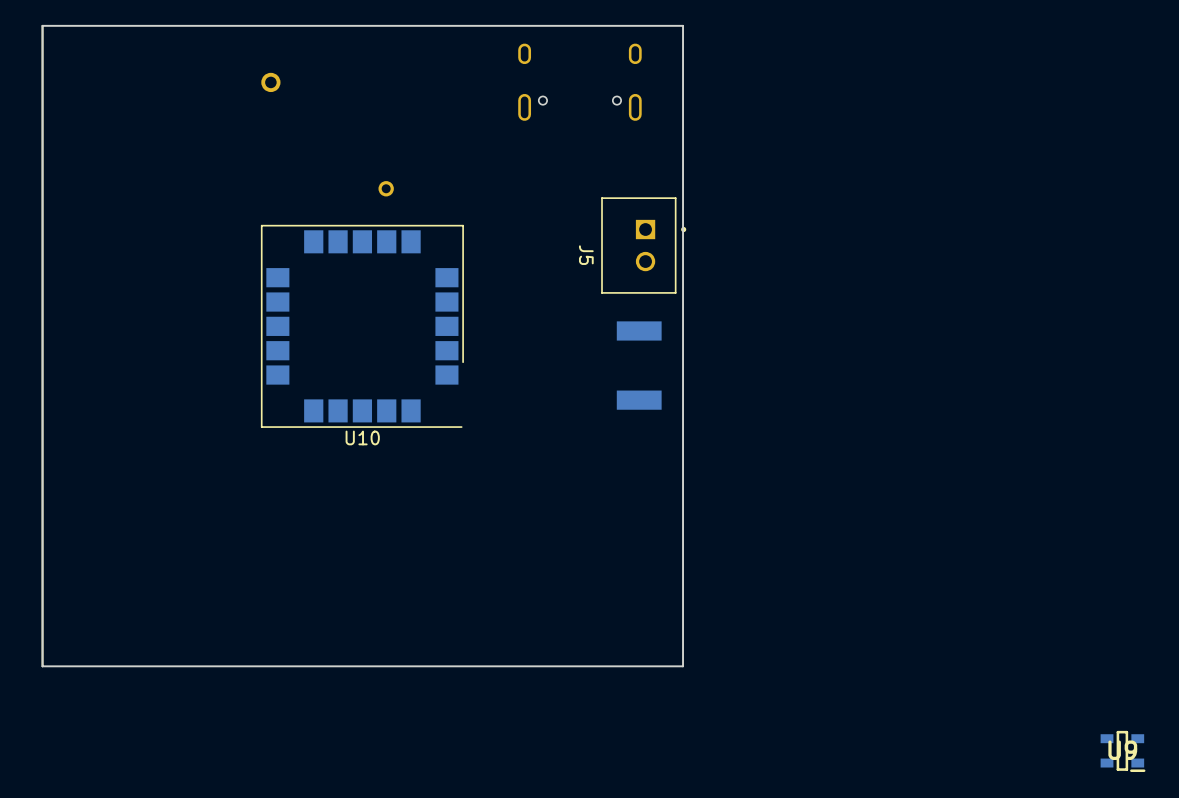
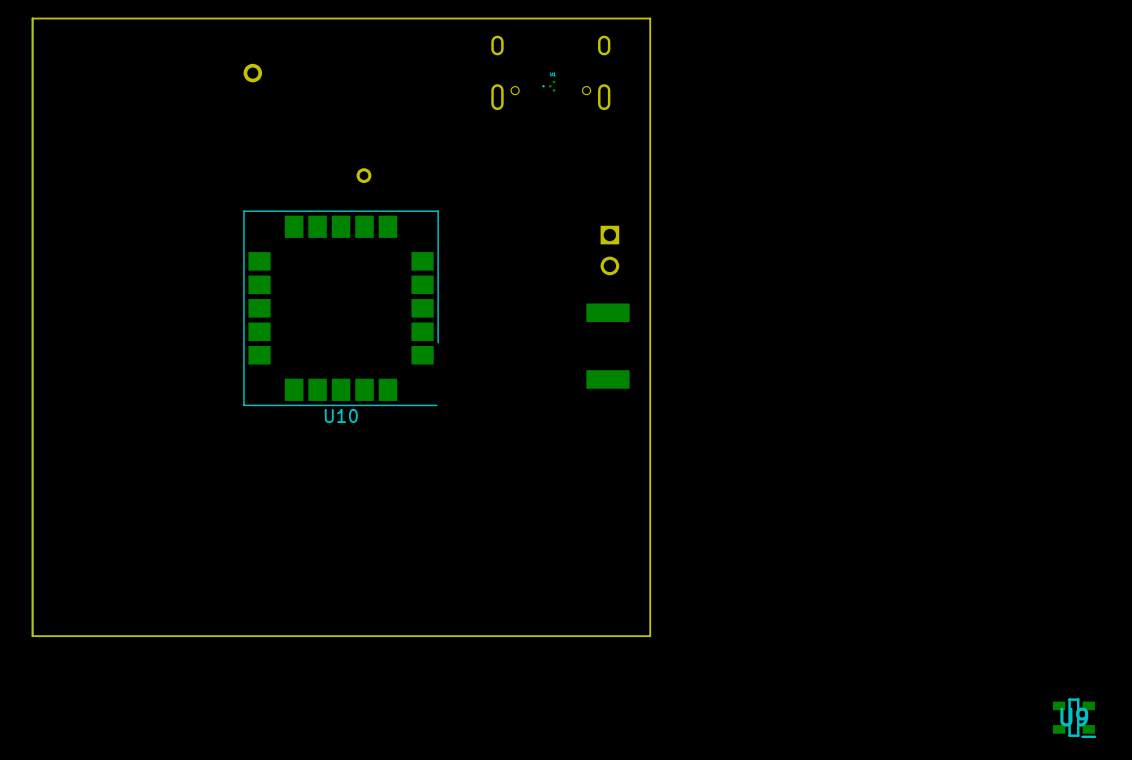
part: none -> (548, 86)
J5 side: bottom (643, 245) -> top (609, 250)

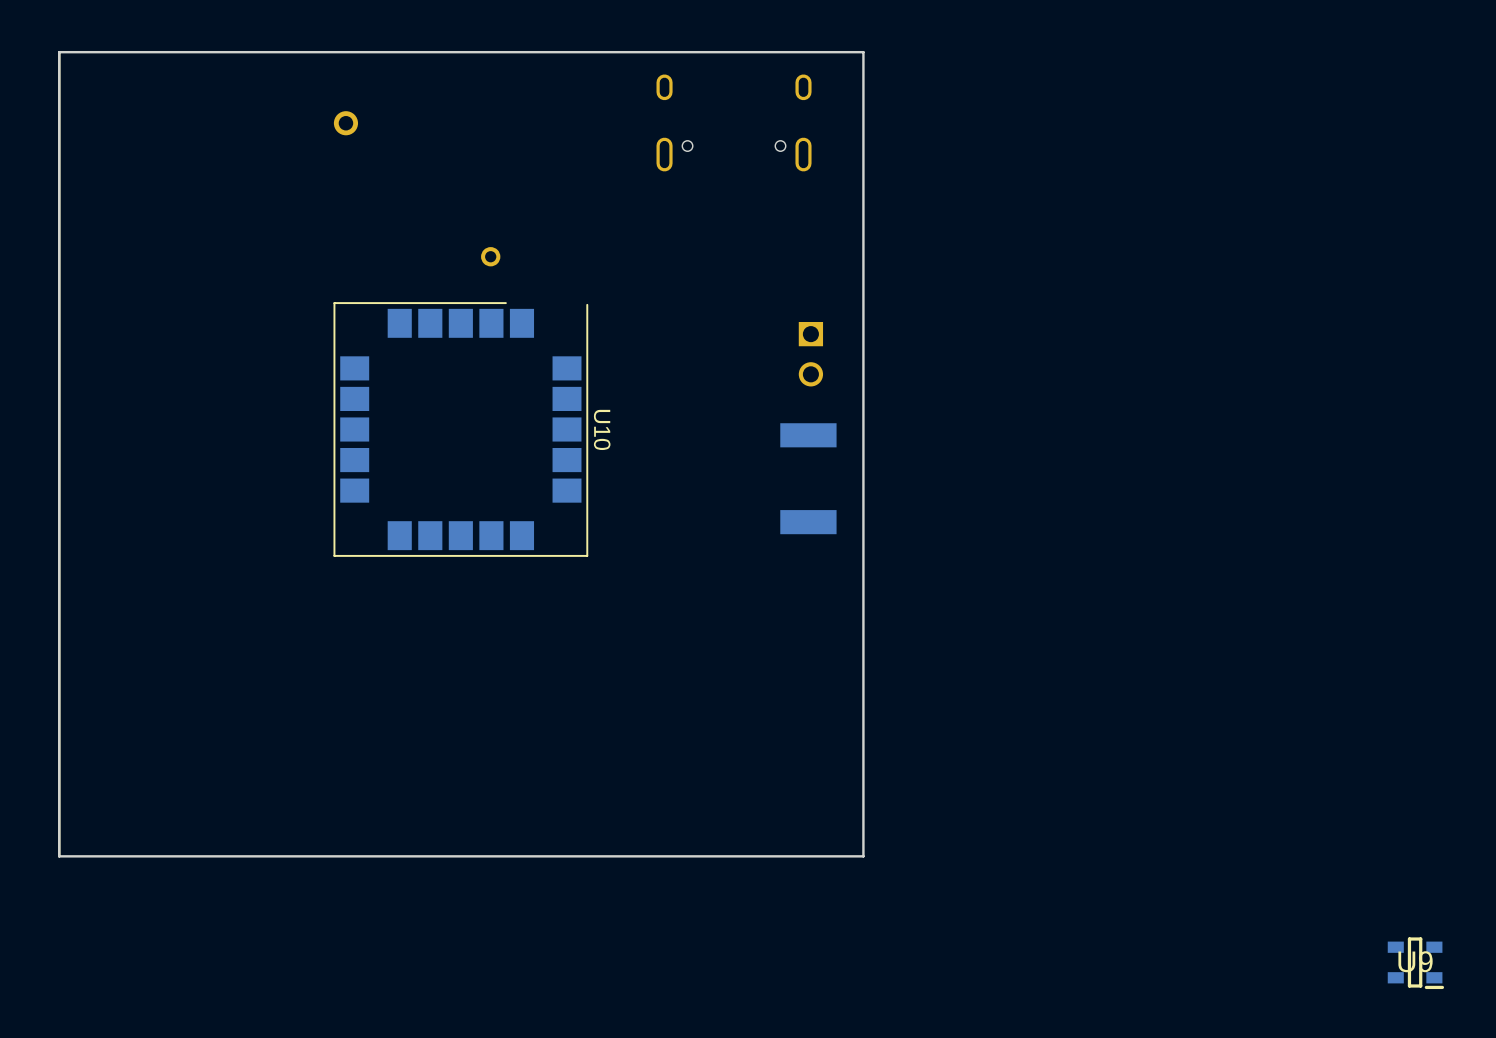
part: (548, 86) -> none
U10 rotation: 0° (341, 308) -> 90° counterclockwise (460, 429)

